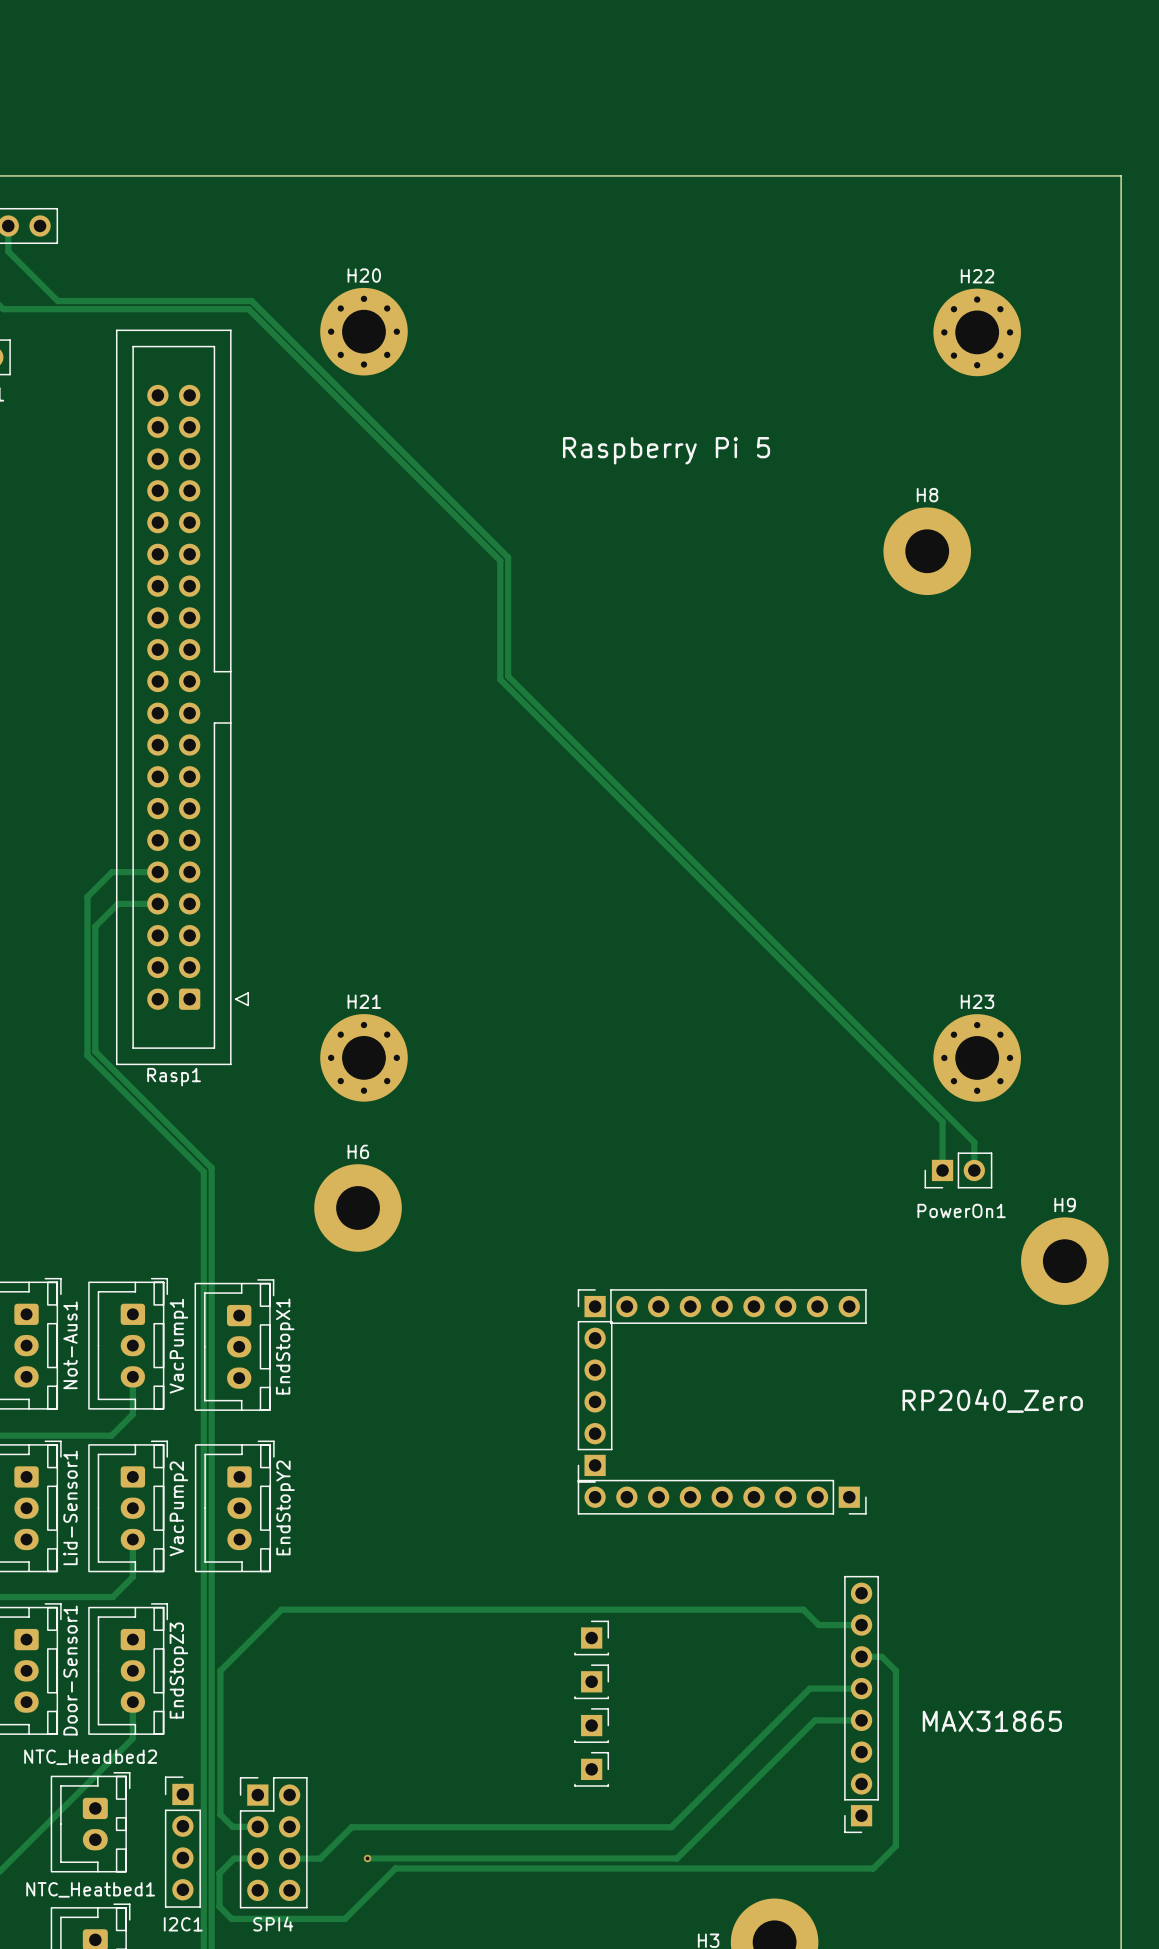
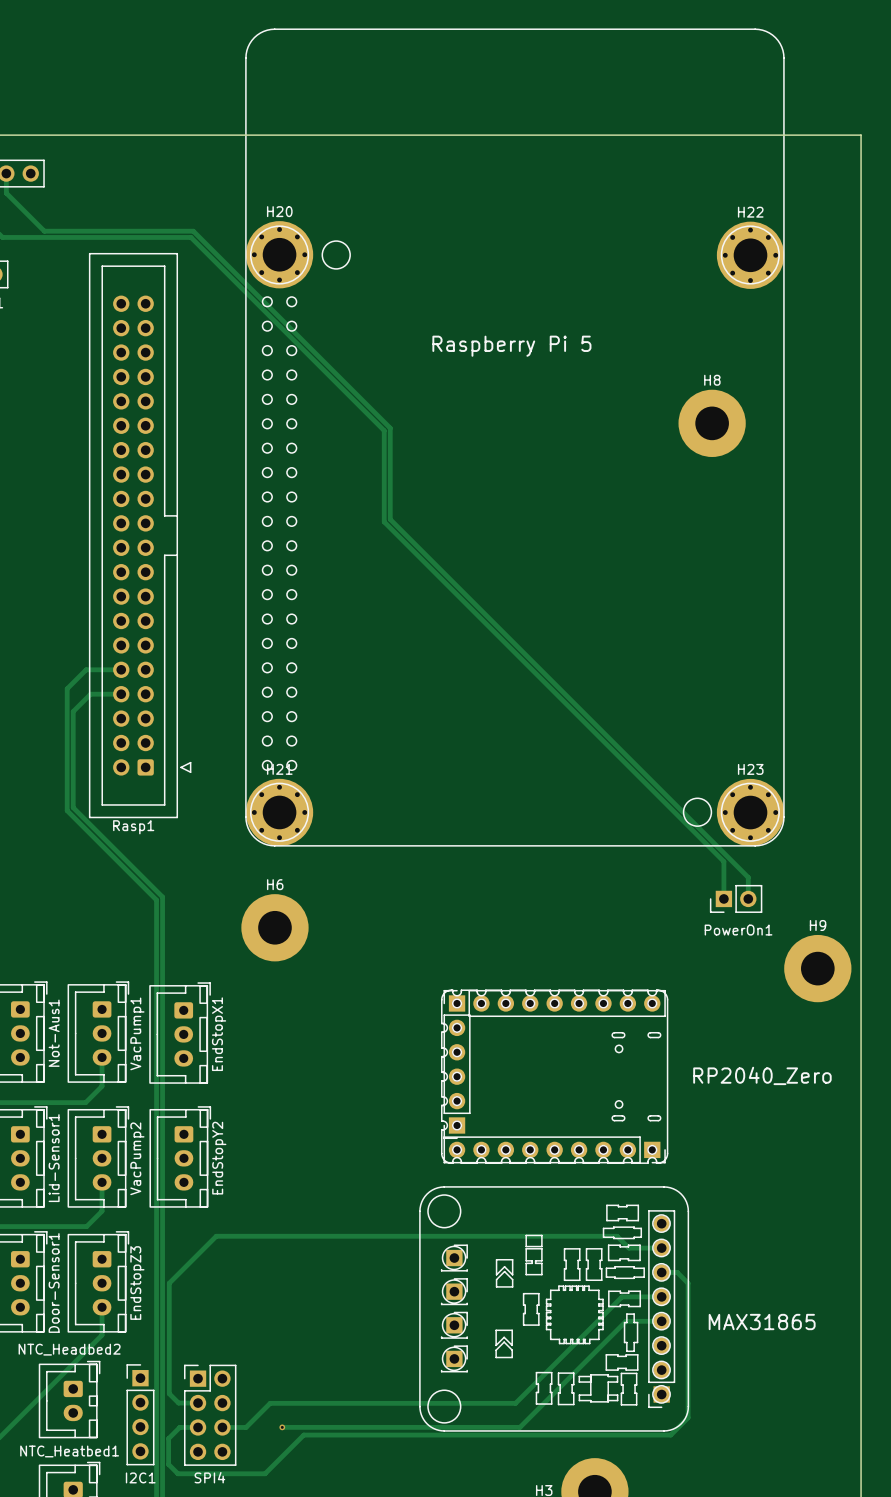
Raspberry Pi 5 footprint: [562, 437, 771, 465] -> [245, 29, 784, 846]
RP2040_Zero footprint: [902, 1388, 1083, 1413] -> [441, 990, 668, 1164]
MAX31865 footprint: [922, 1710, 1062, 1732] -> [419, 1186, 689, 1431]

